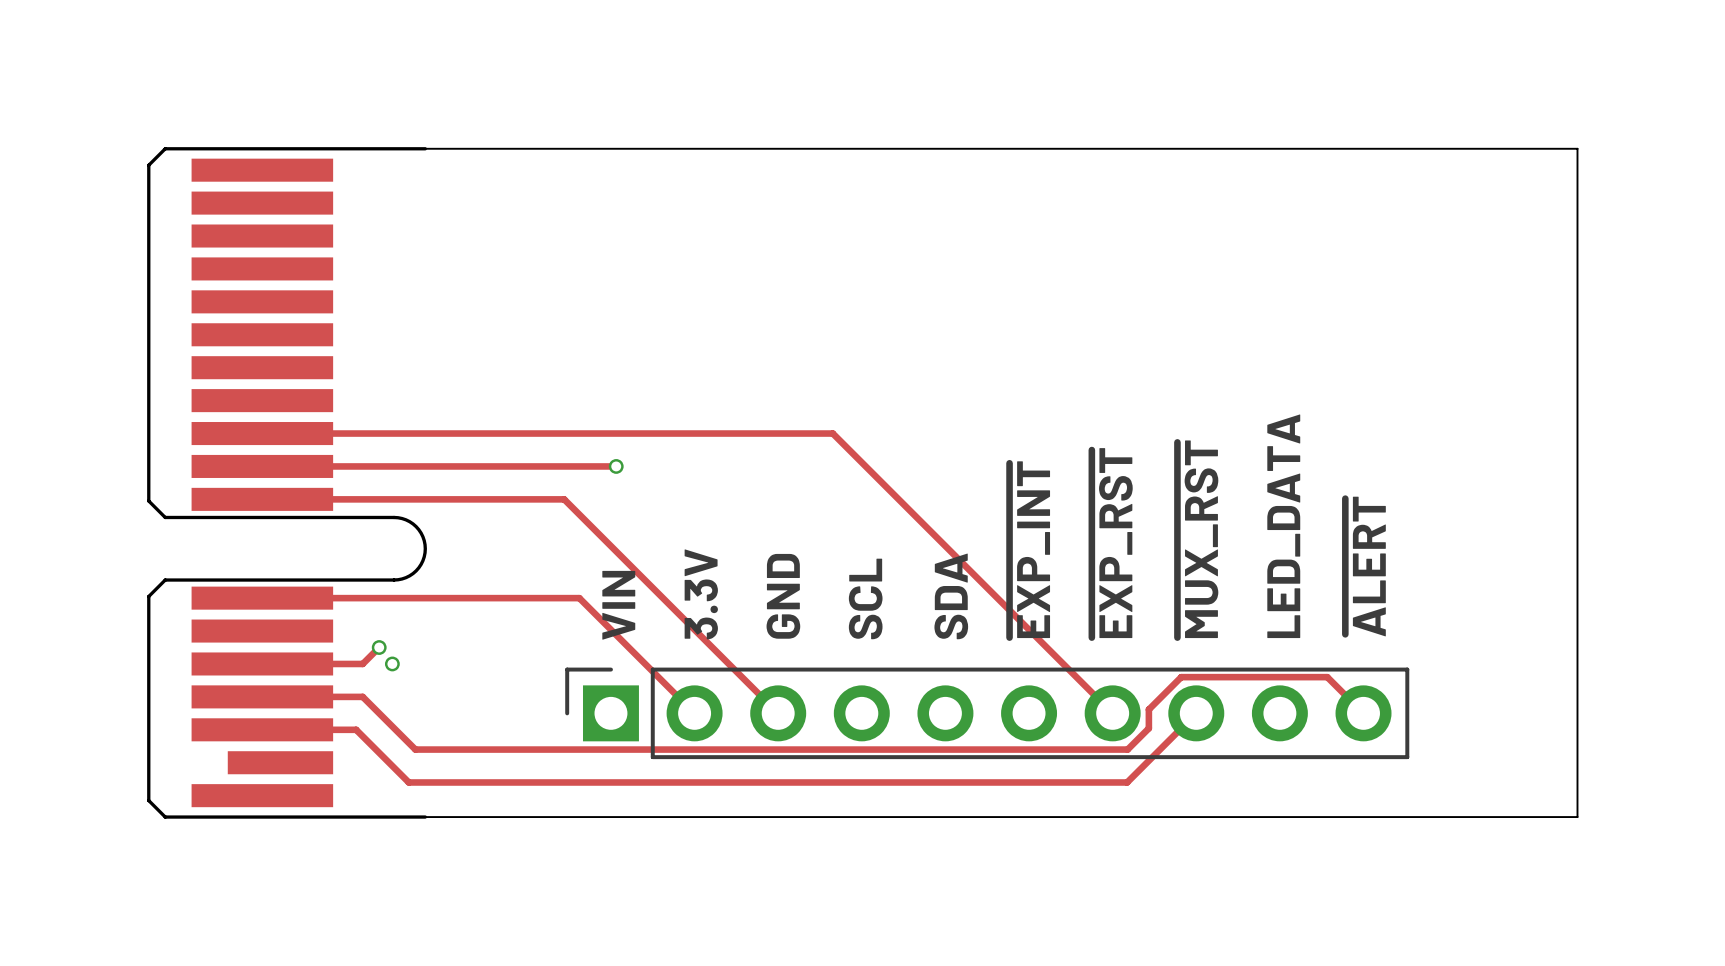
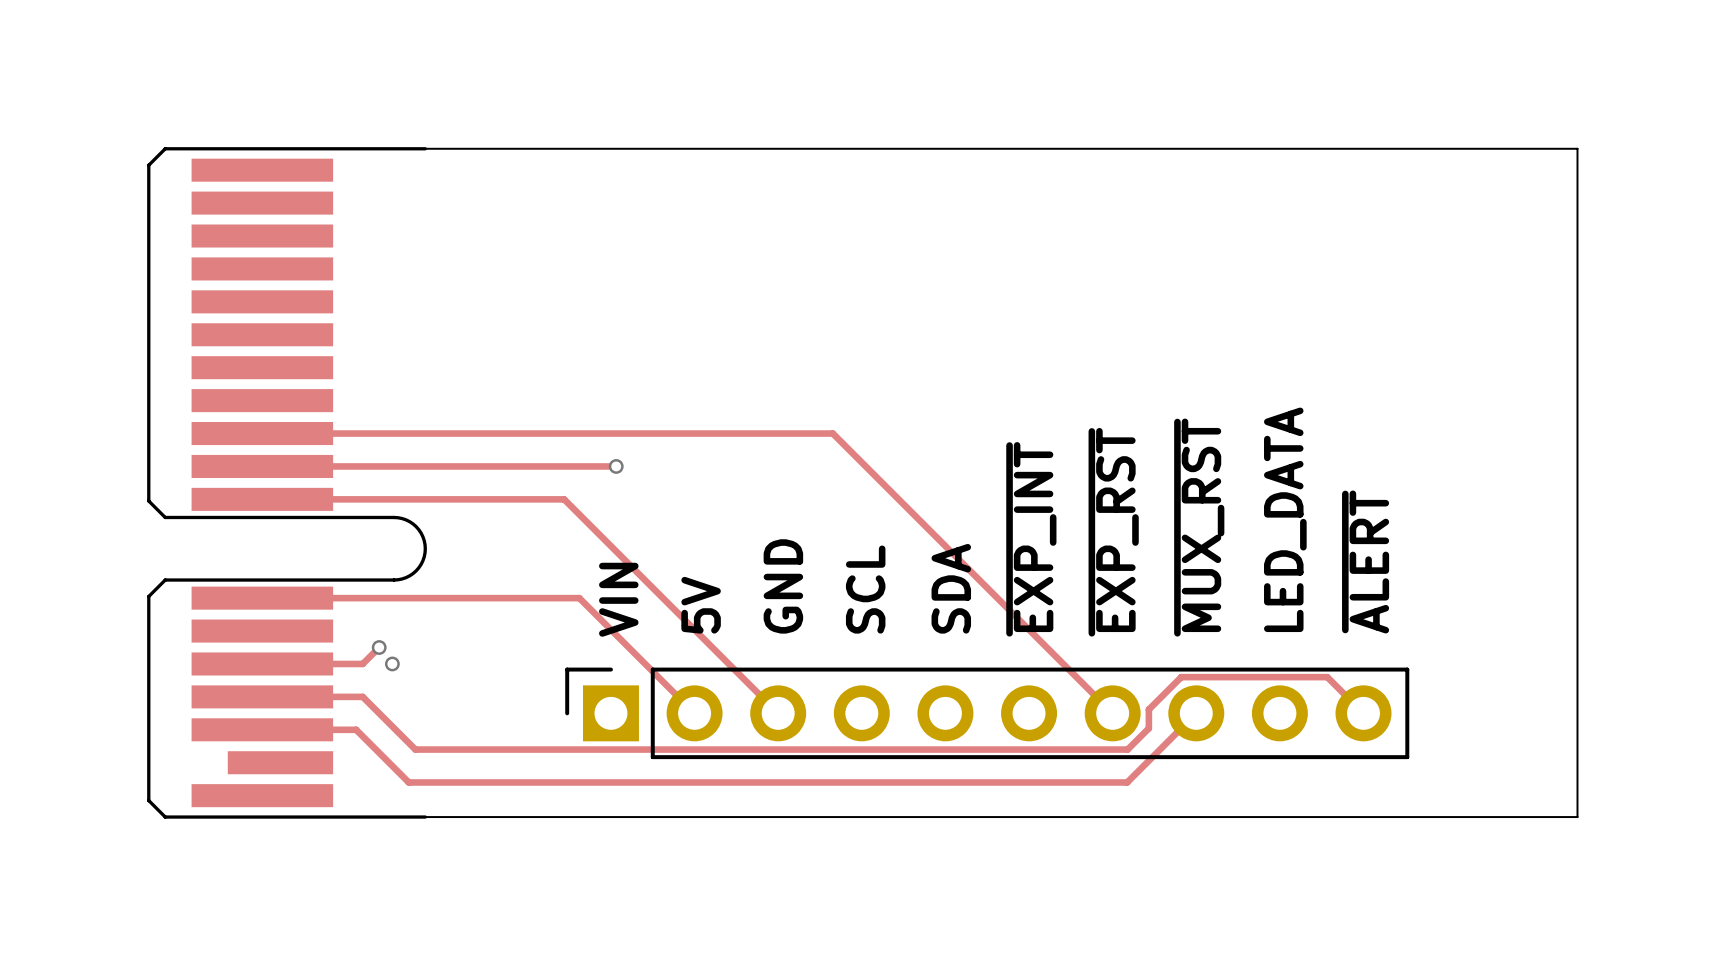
text: 3.3V (701, 594) -> 5V (701, 605)

